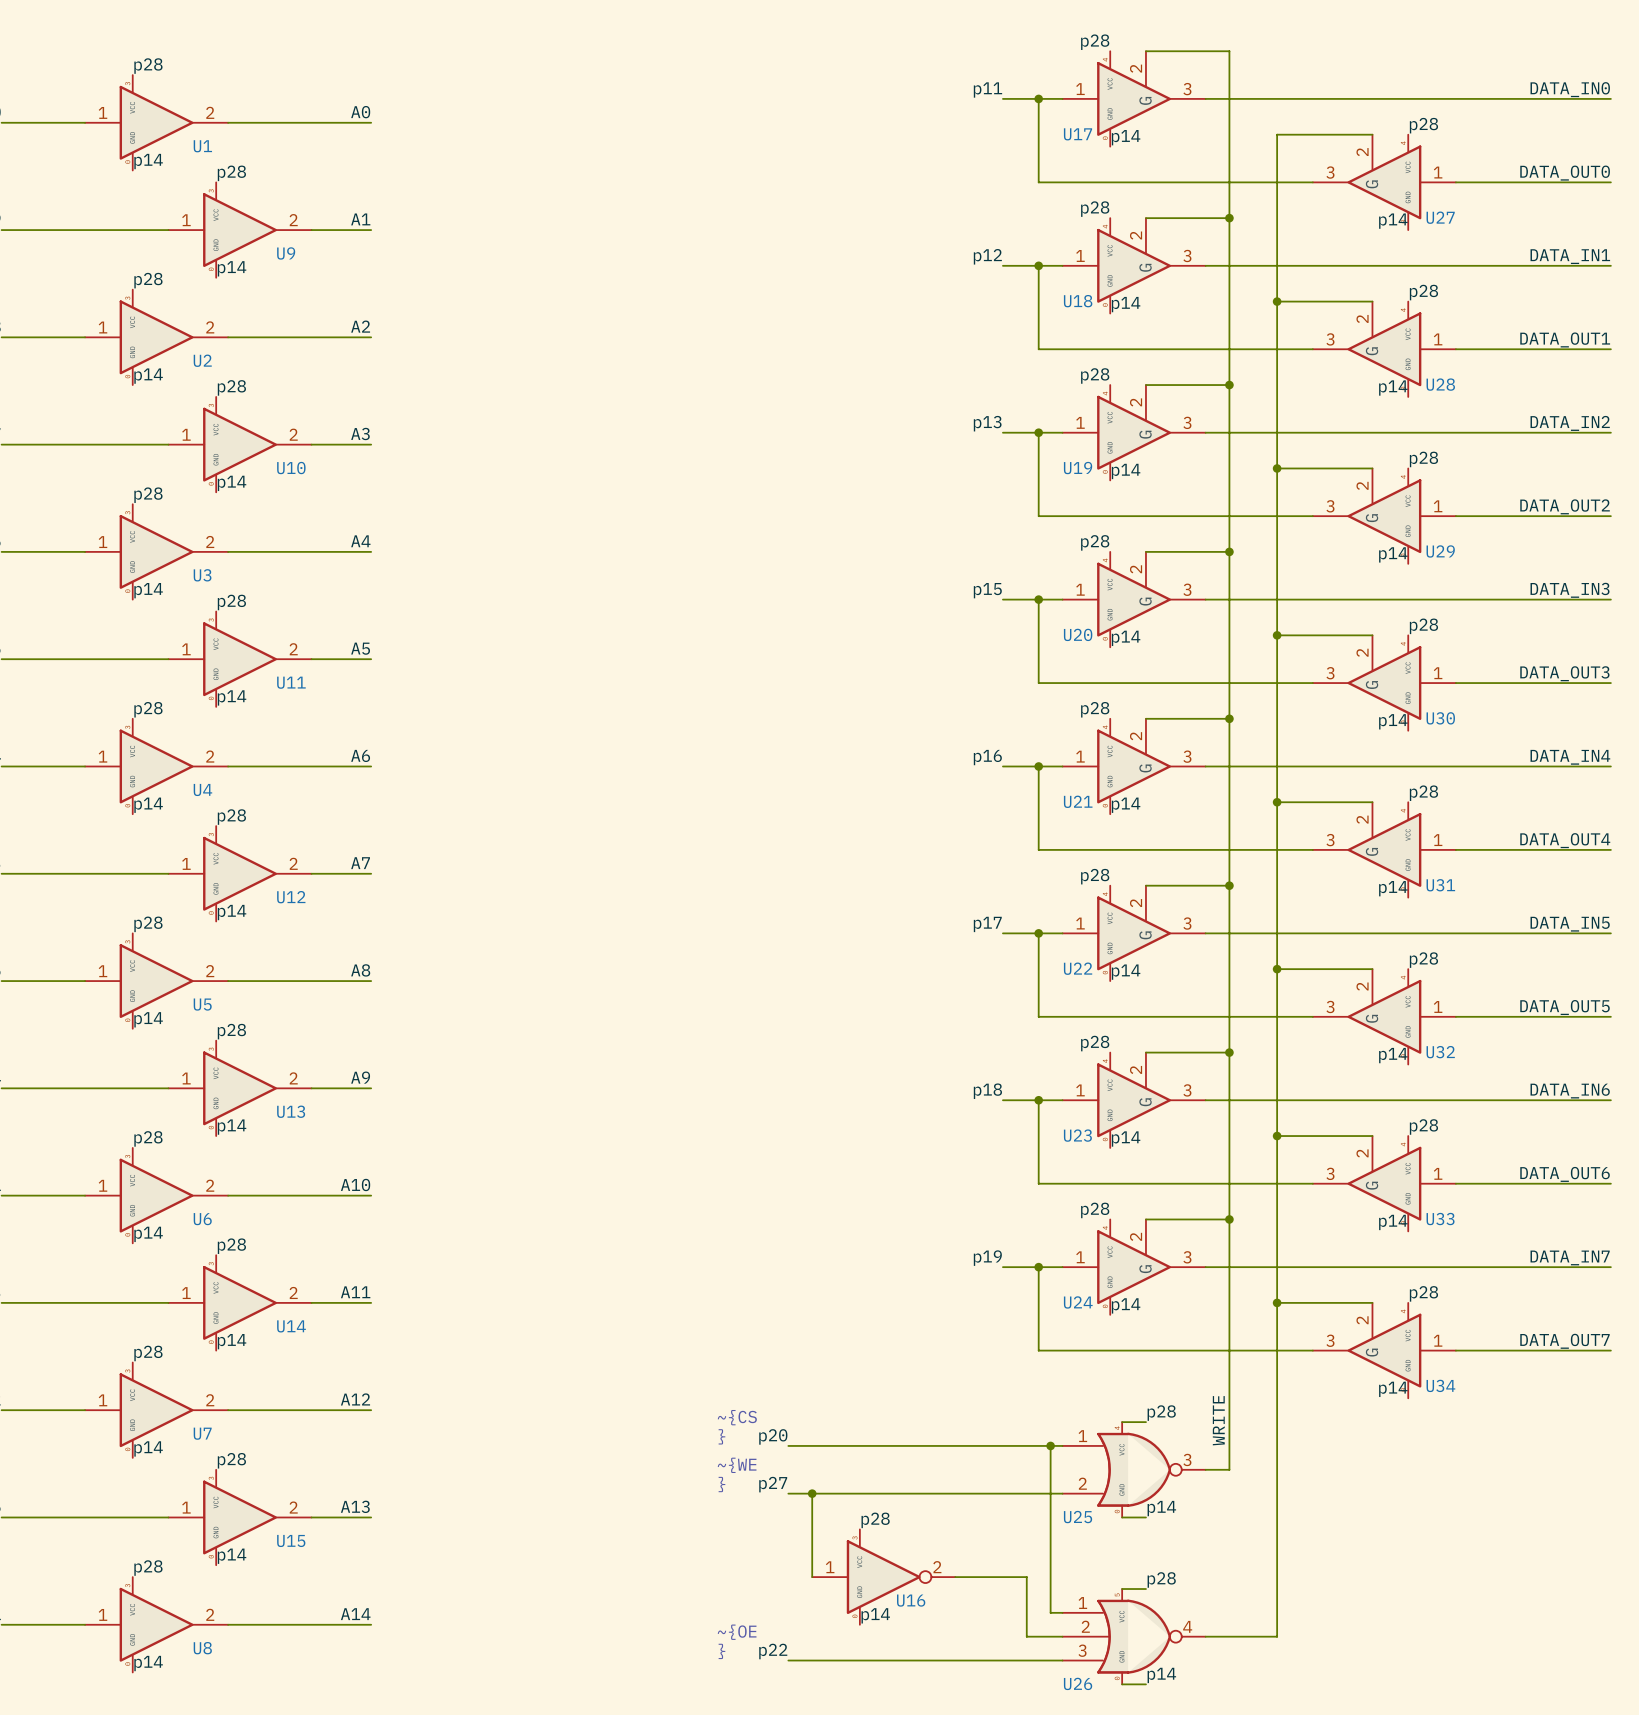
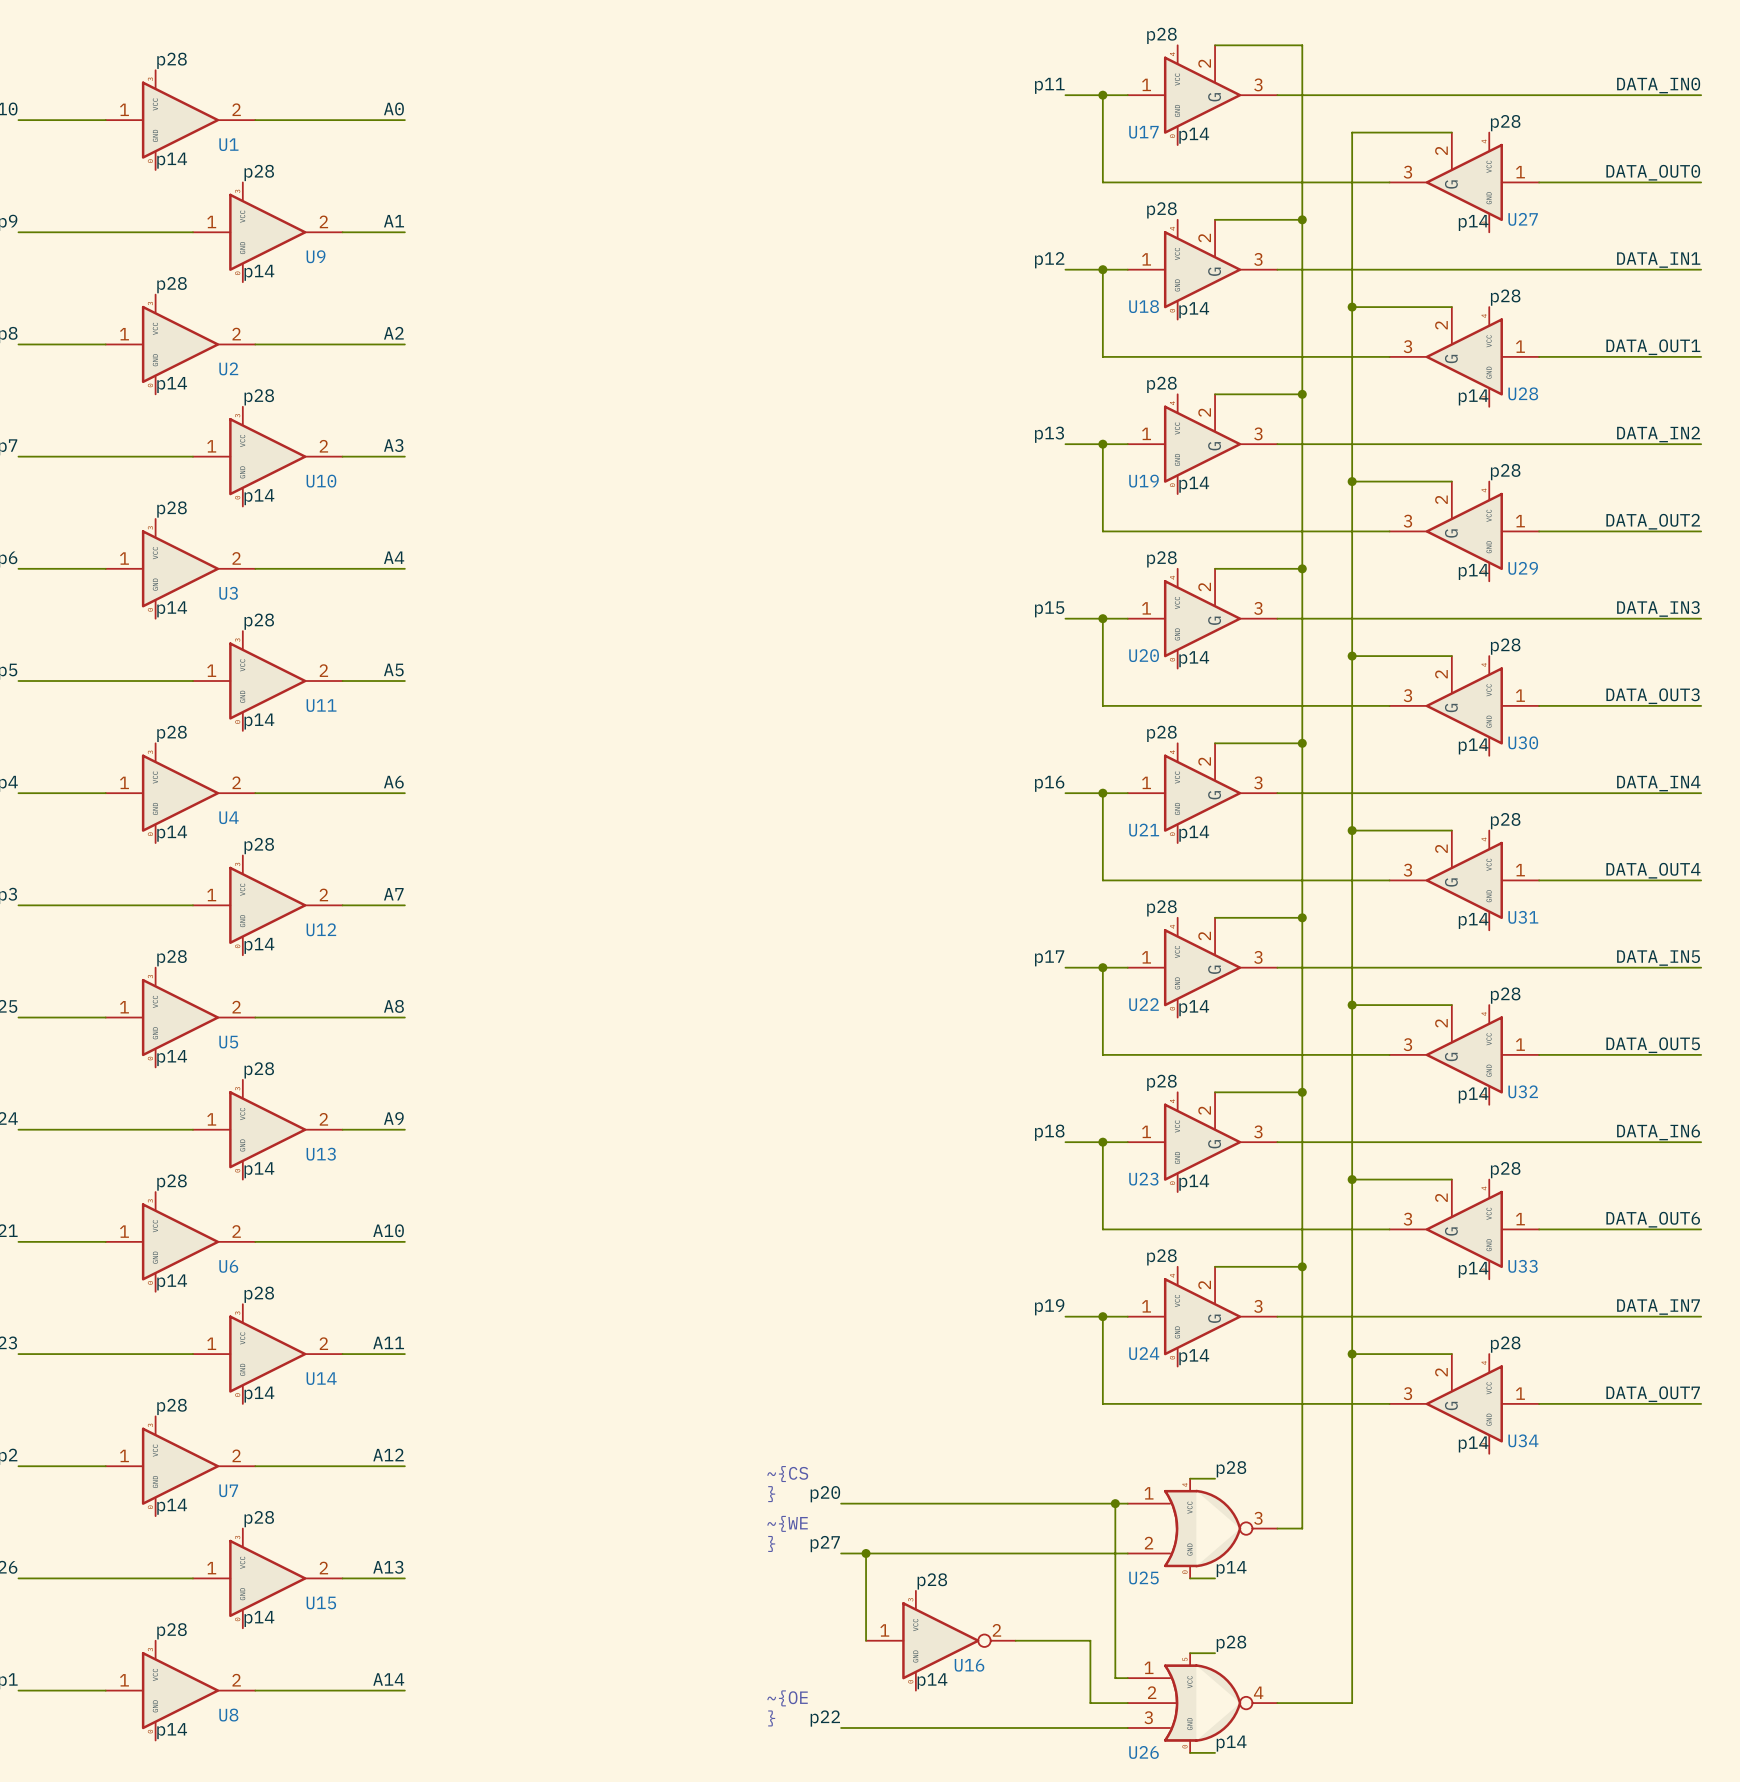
label: WRITE (1218, 1420) -> none

